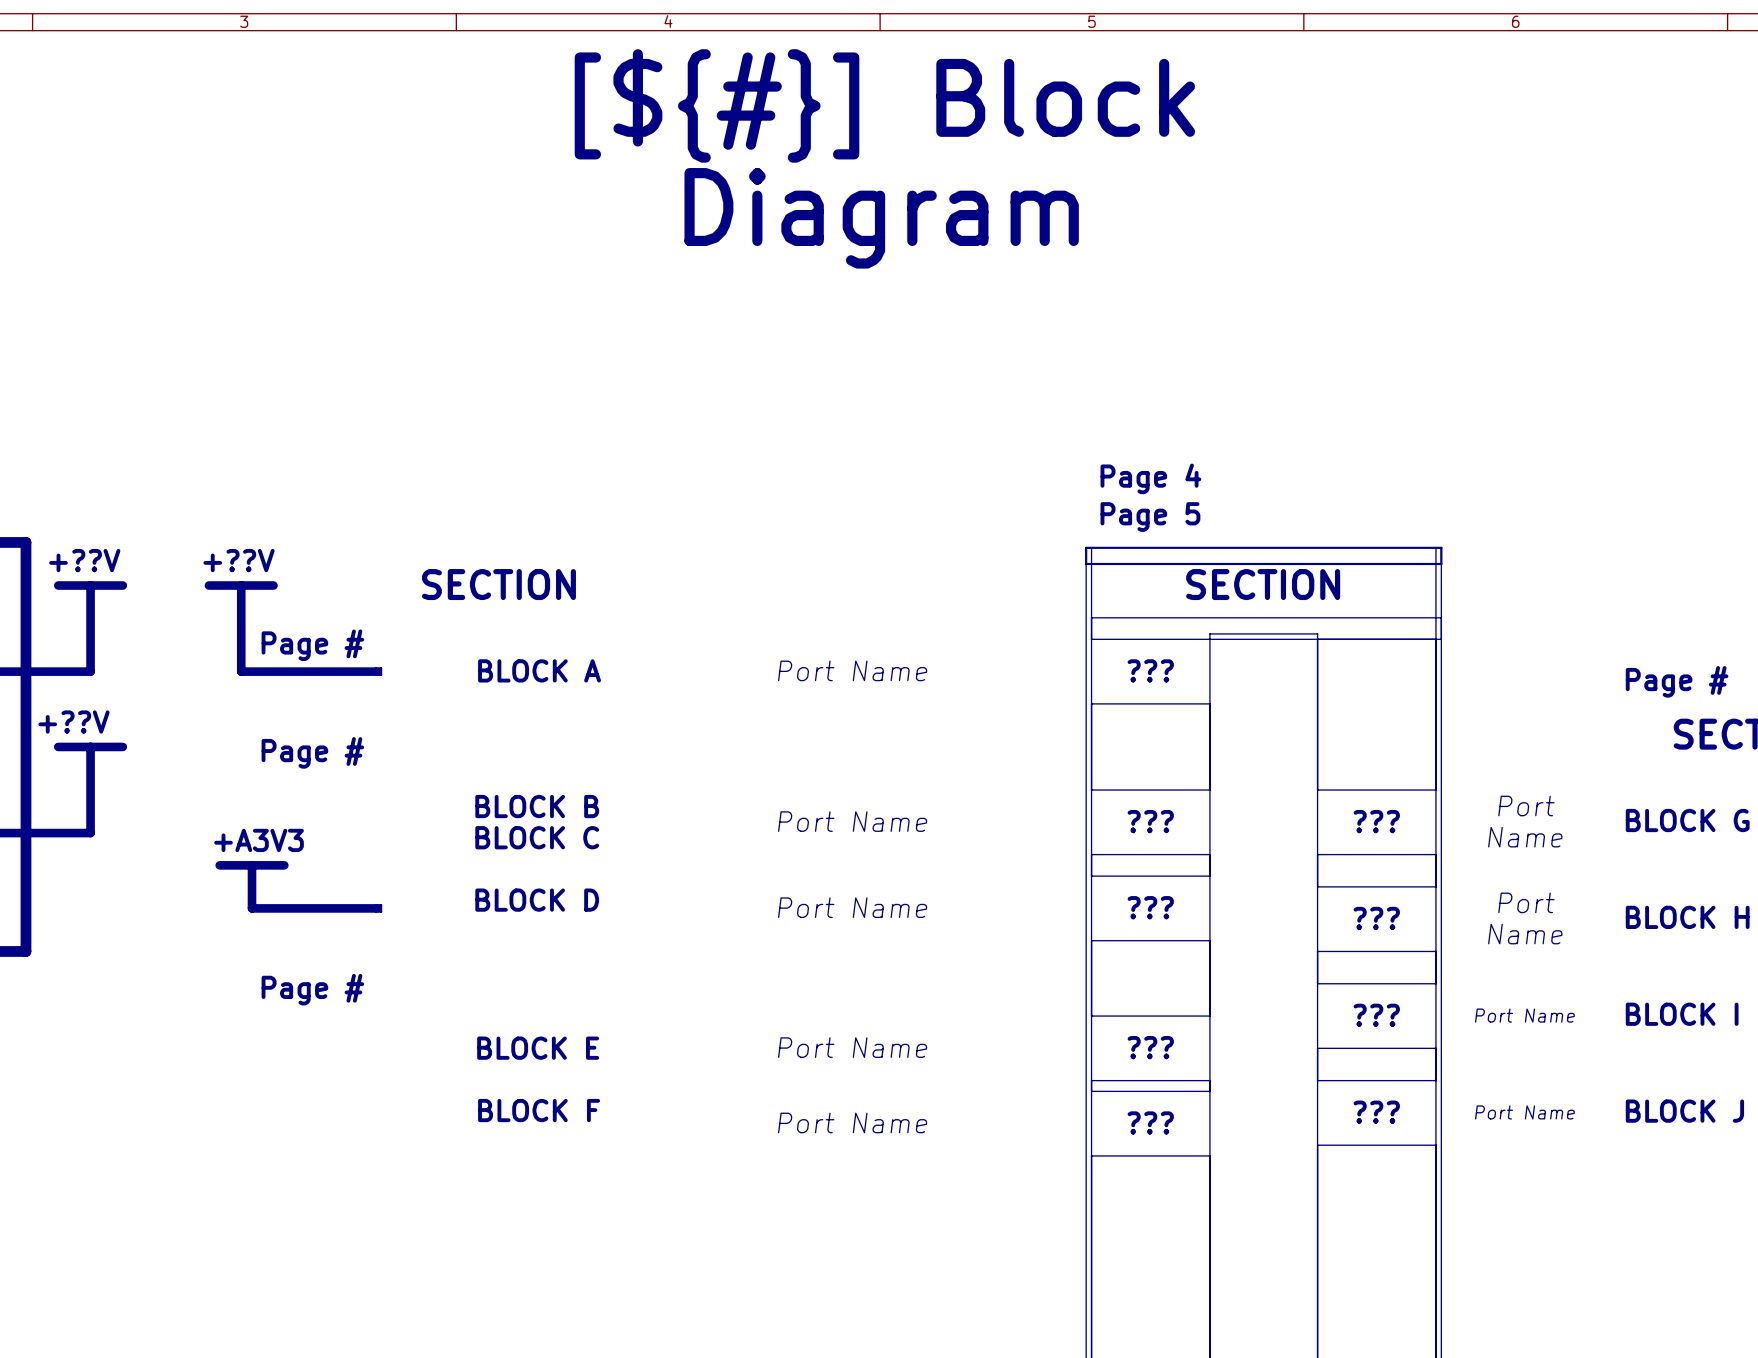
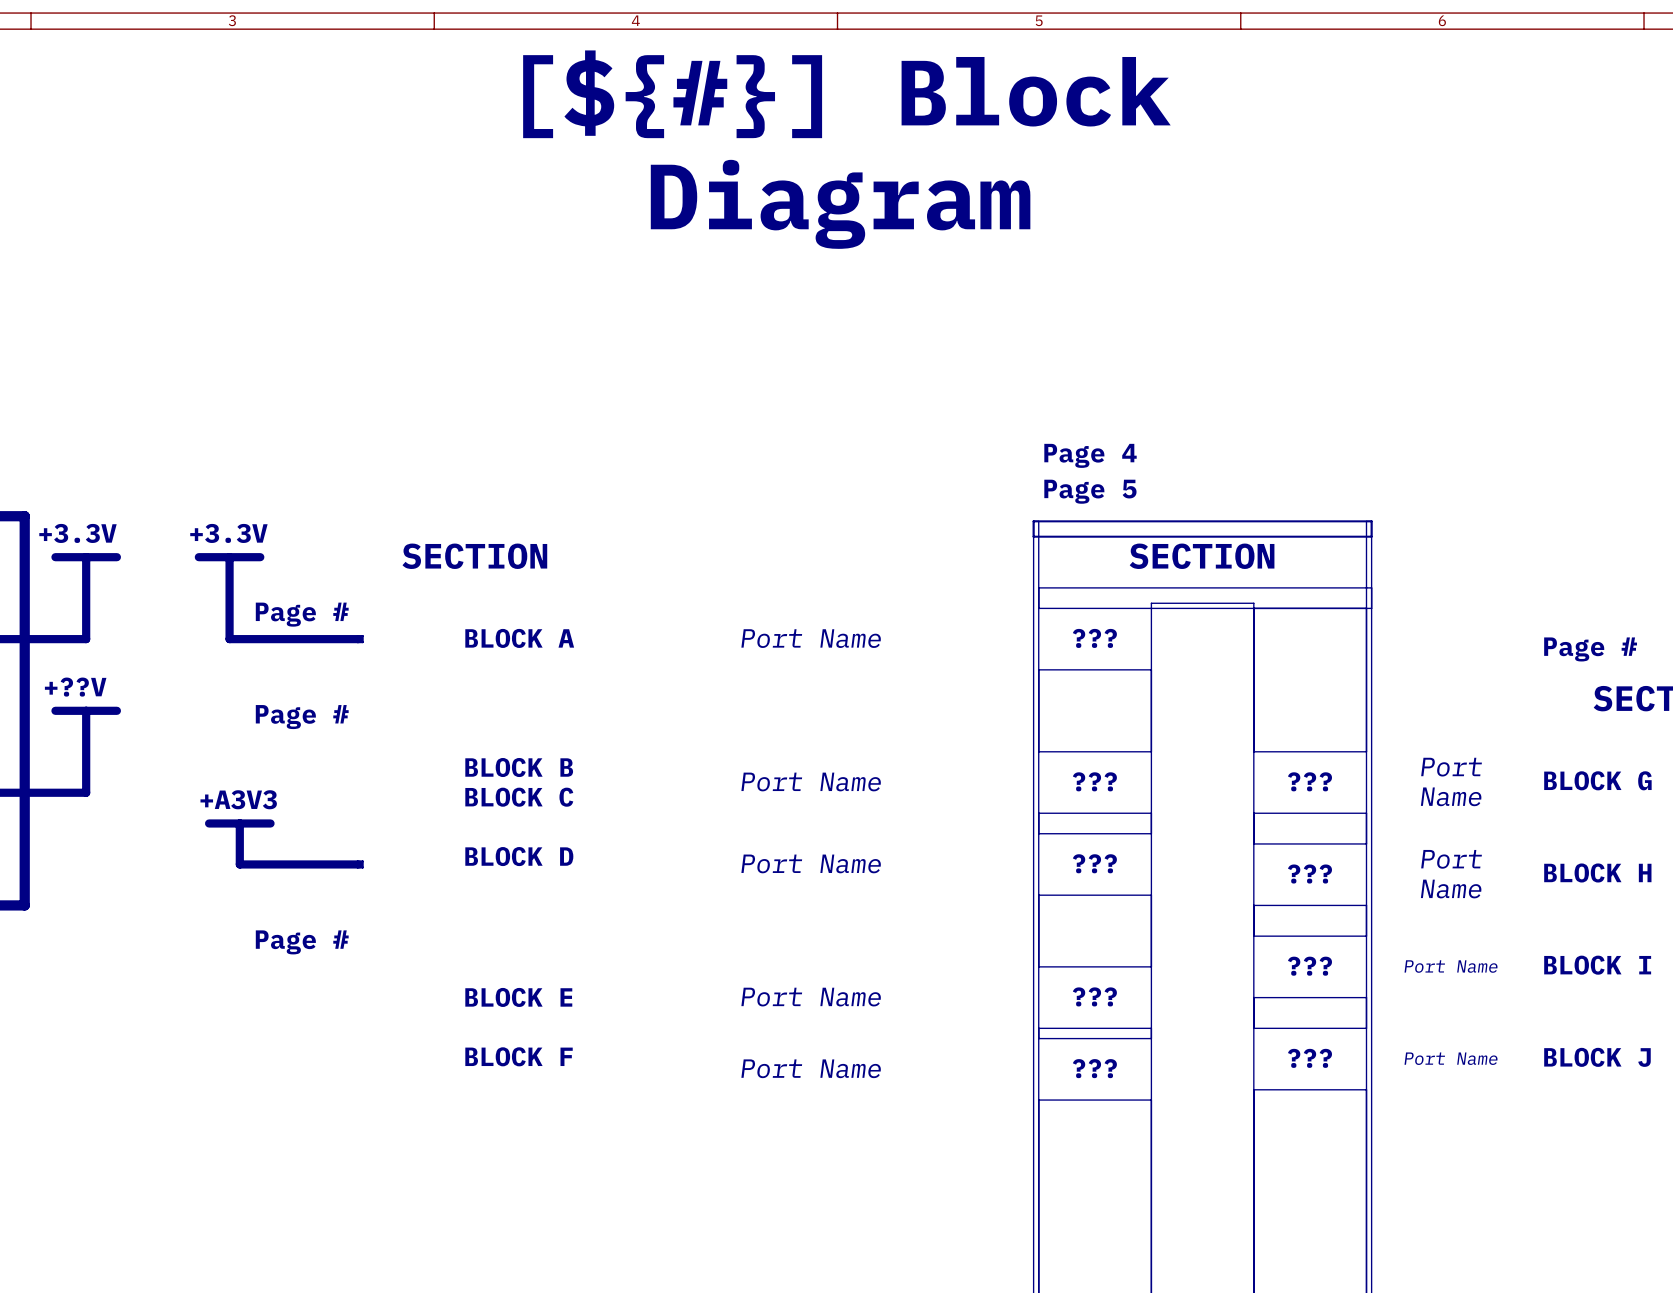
text: +??V (84, 560) -> +3.3V (77, 533)
text: +??V (239, 560) -> +3.3V (228, 533)

